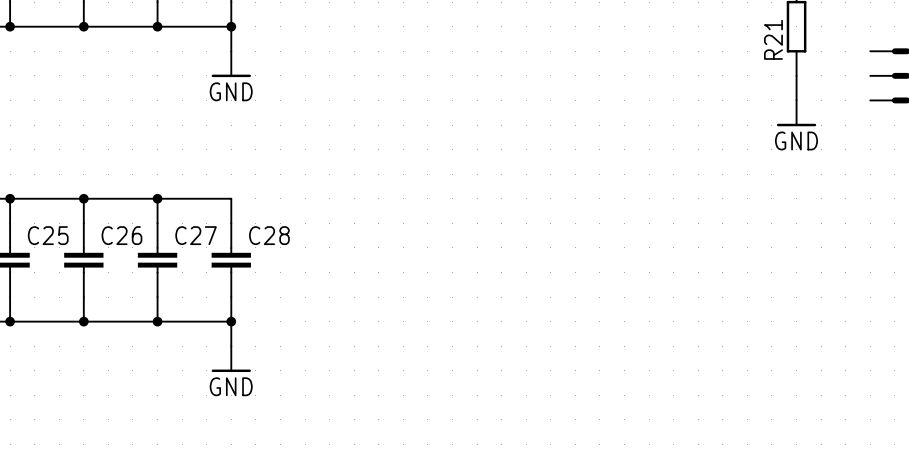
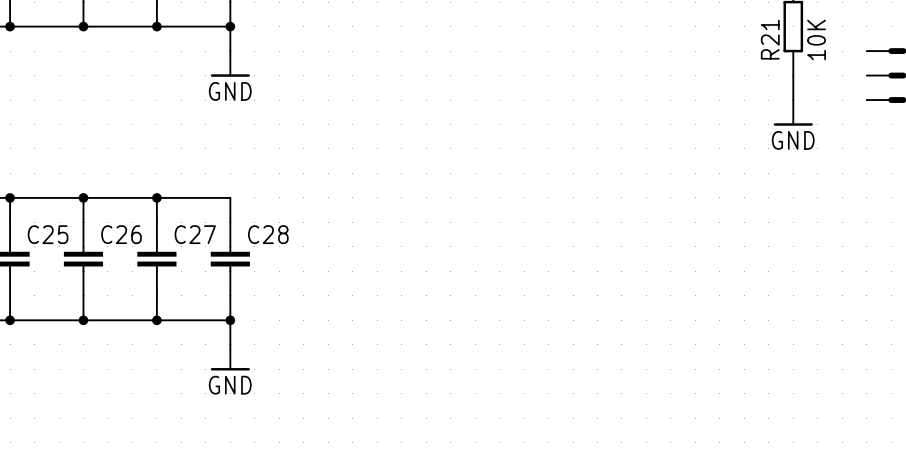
R21 value: none -> 10K (816, 40)

